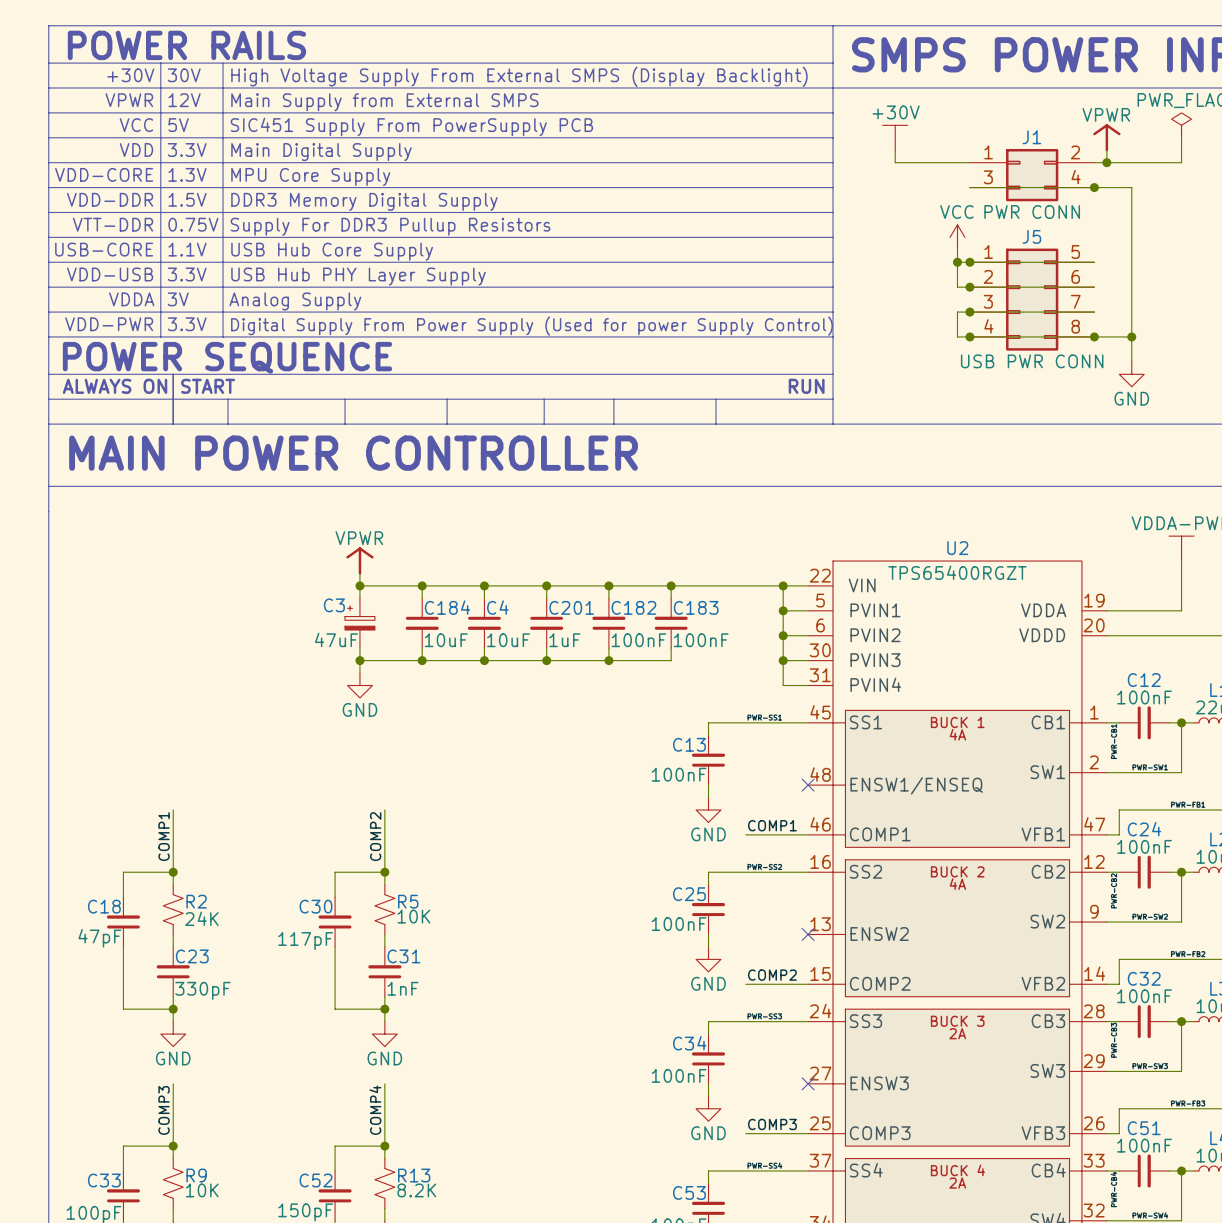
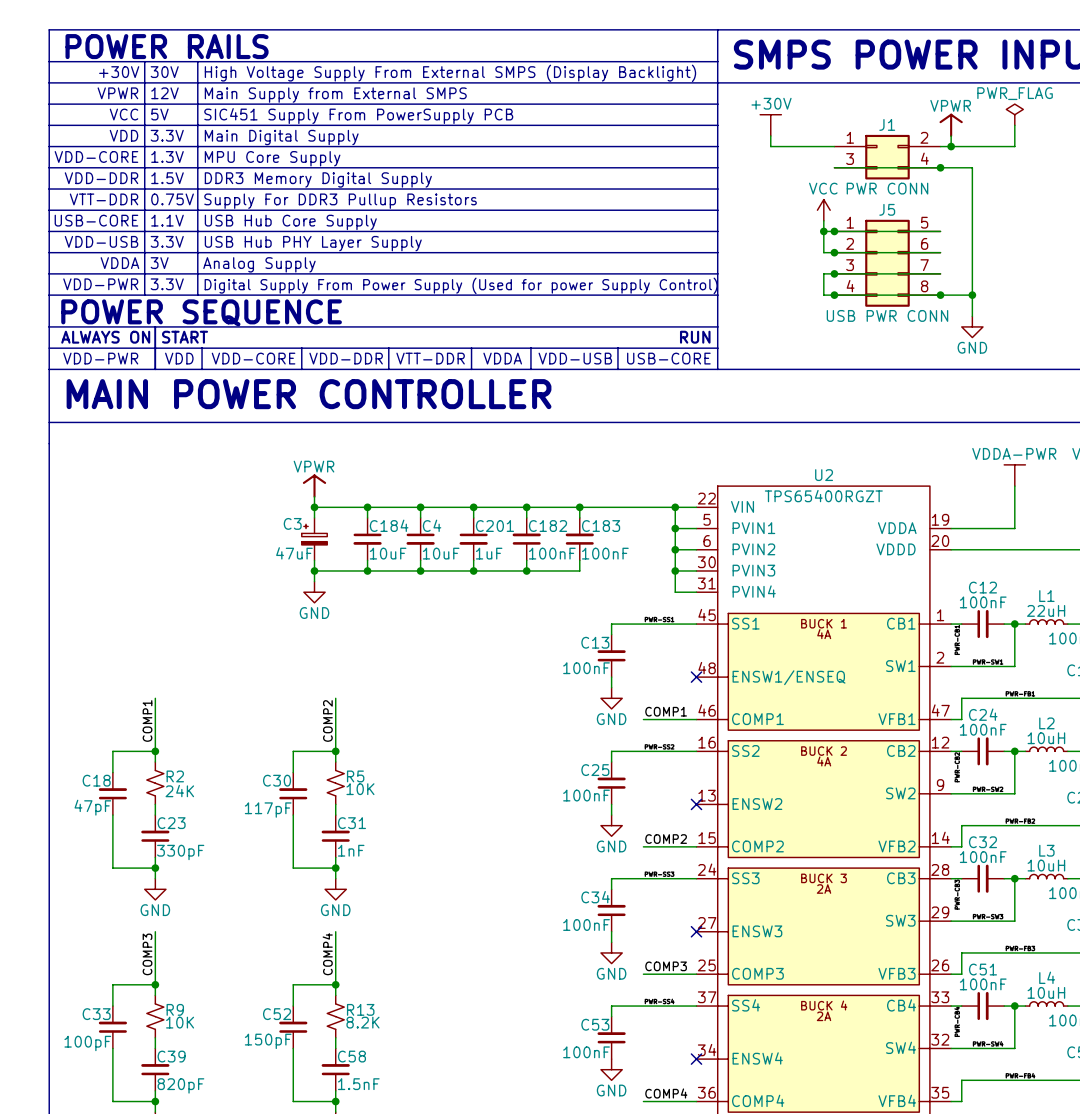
text: none -> VDD-PWR (100, 358)
text: none -> VDD (179, 358)
text: none -> VDD-CORE (253, 358)
text: none -> VDD-DDR (346, 358)
text: none -> VTT-DDR (430, 358)
text: none -> VDDA (502, 358)
text: none -> VDD-USB (575, 358)
text: none -> USB-CORE (668, 358)

